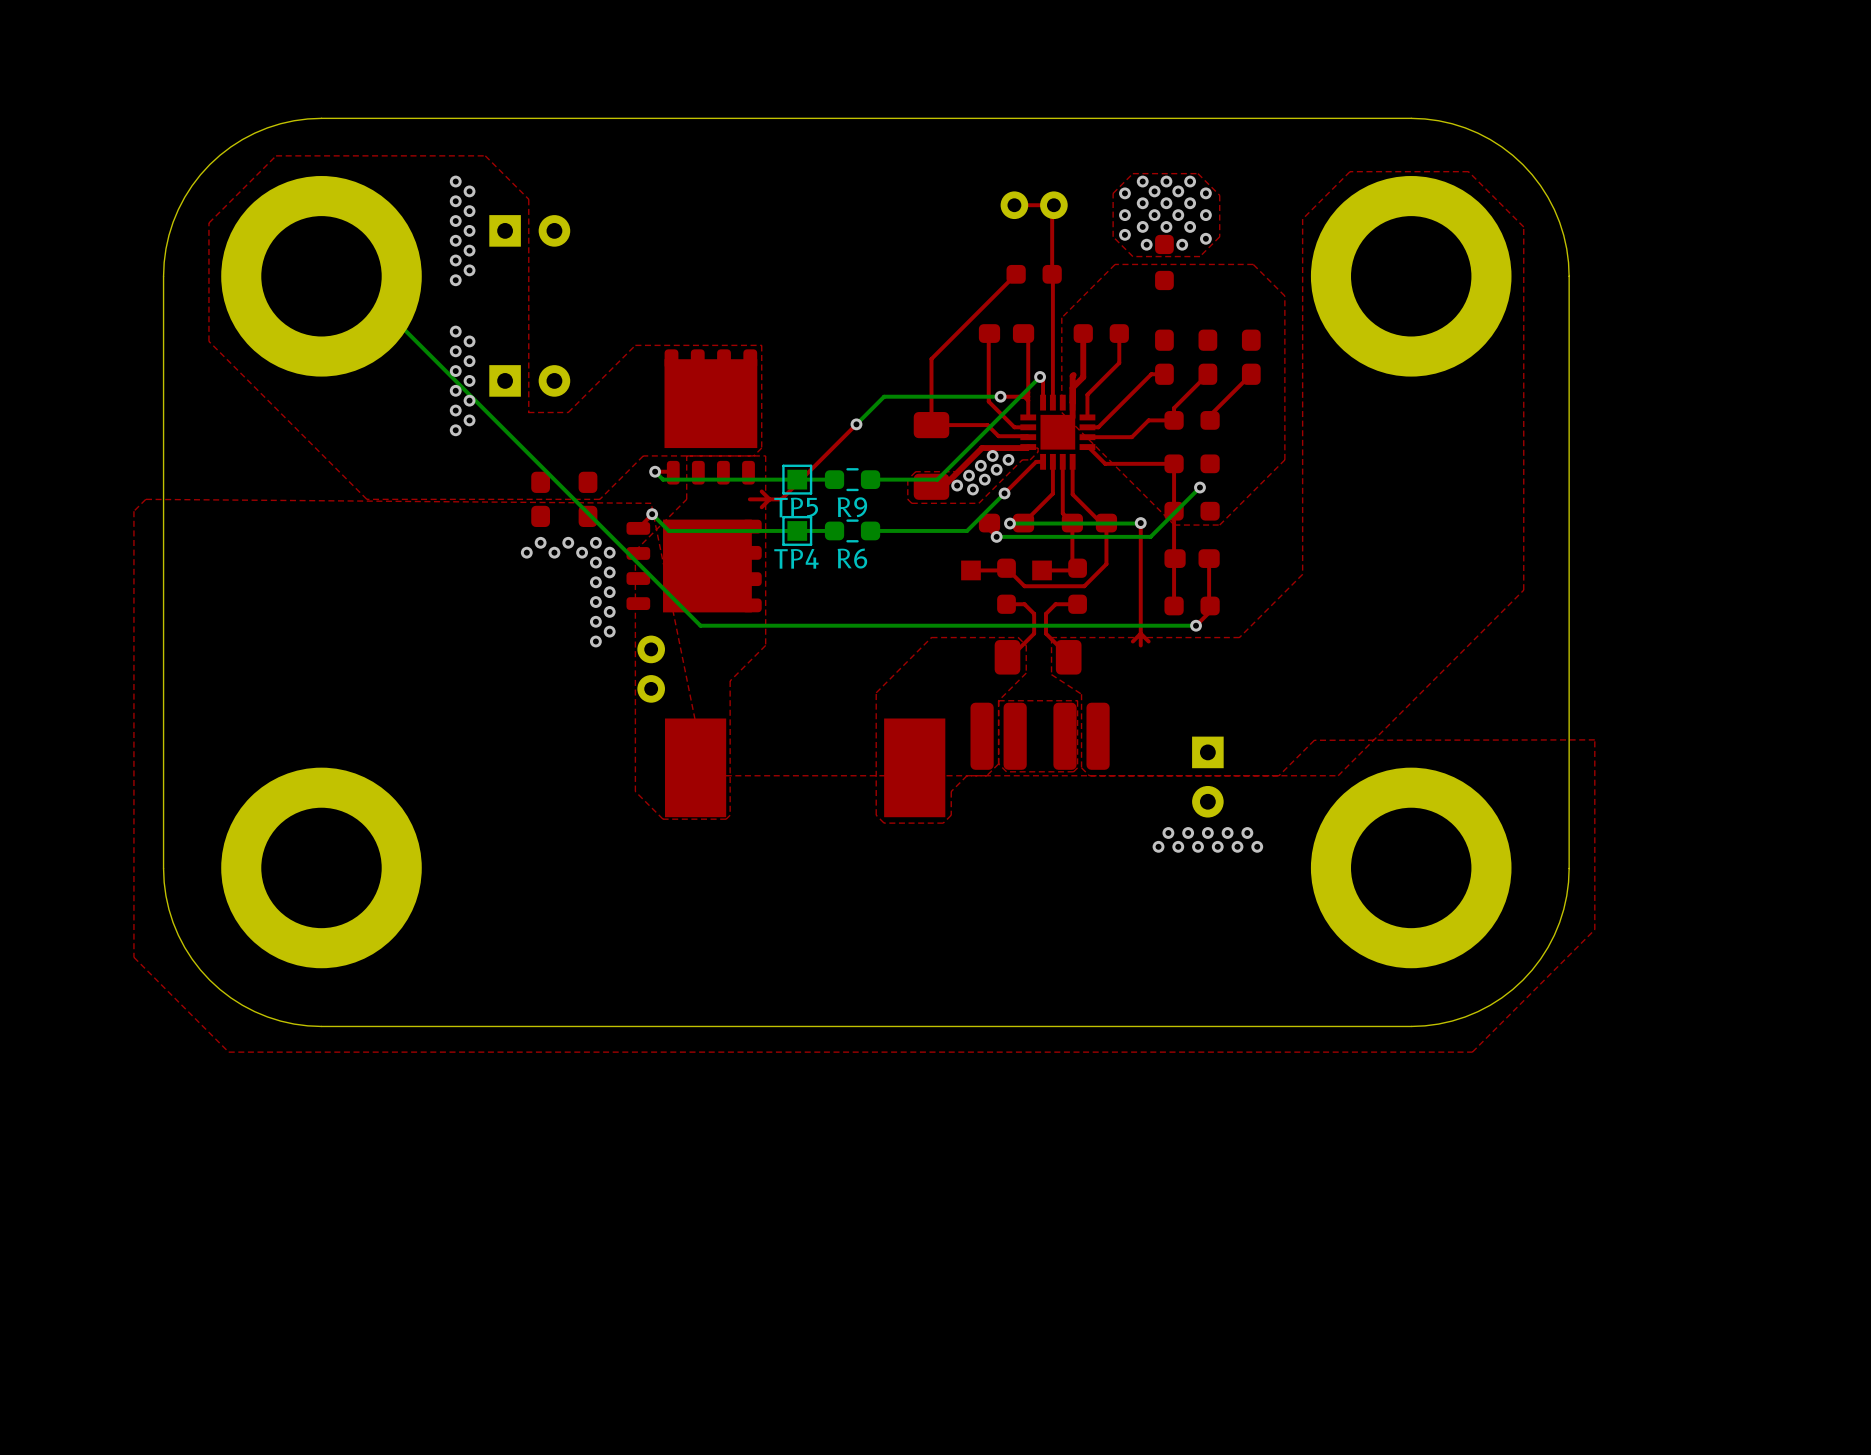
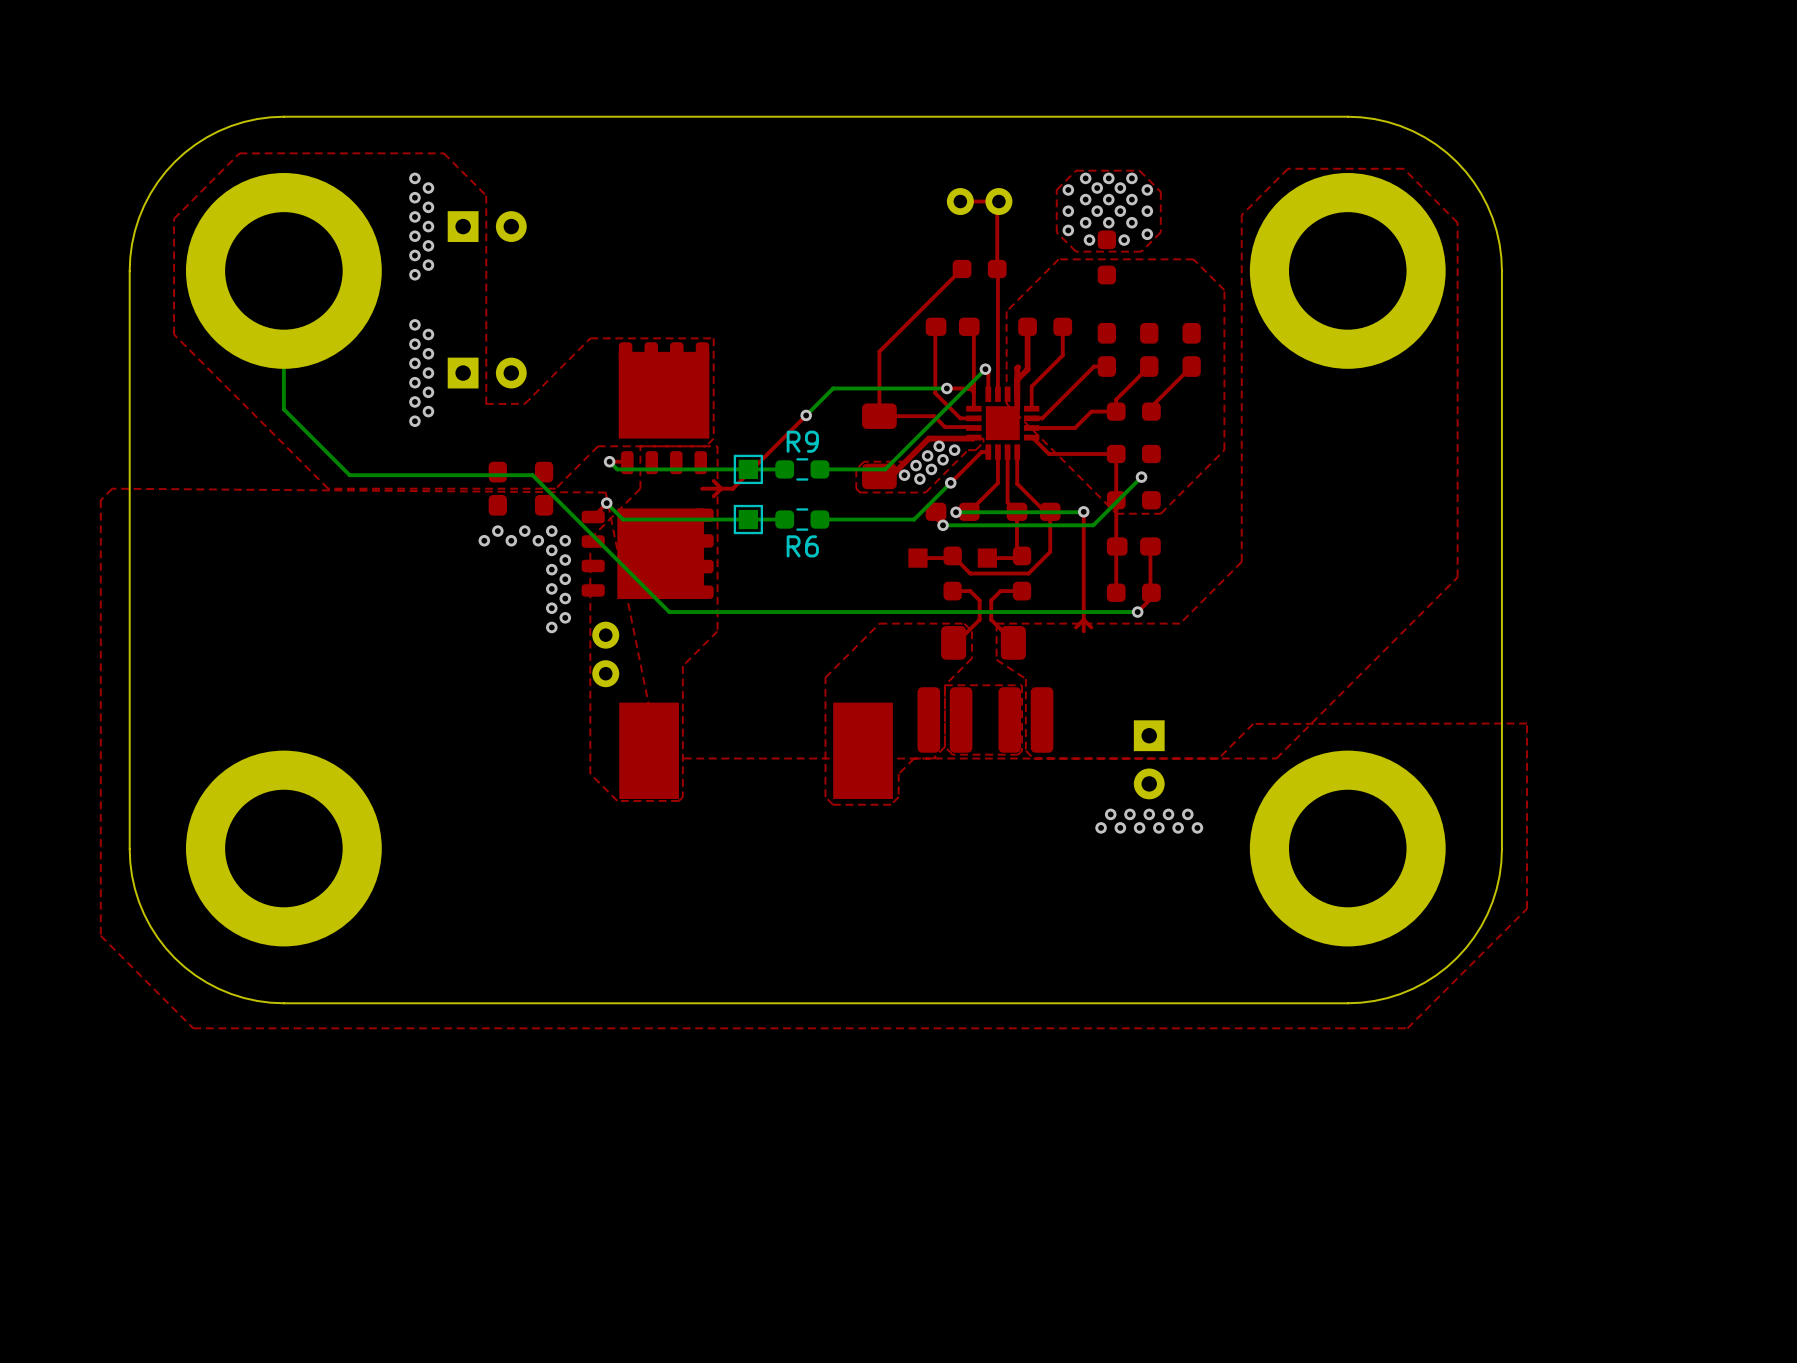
bottom track: (351, 276) (700, 625) (716, 625) -> (283, 270) (283, 409) (349, 475) (532, 475) (669, 612)
TP5 name: TP5 (796, 507) -> none
R9 name position: R9 (852, 507) -> R9 (802, 441)
TP4 name: TP4 (796, 558) -> none

